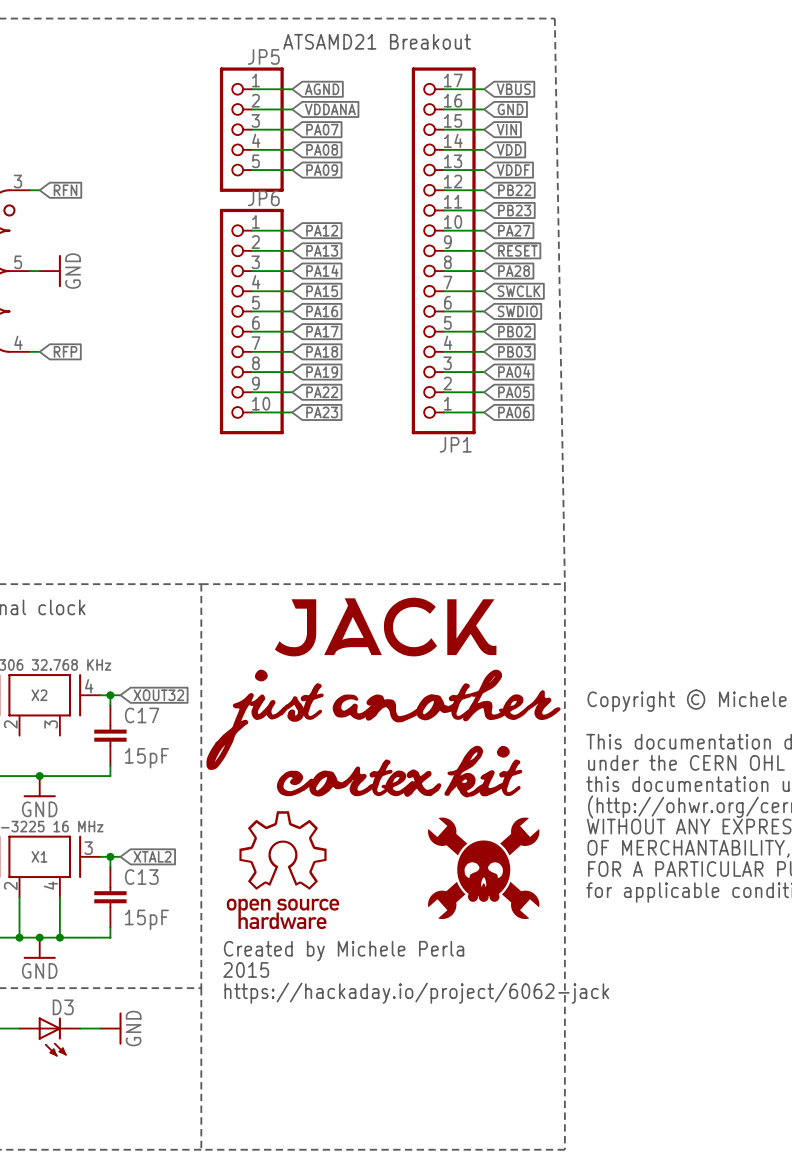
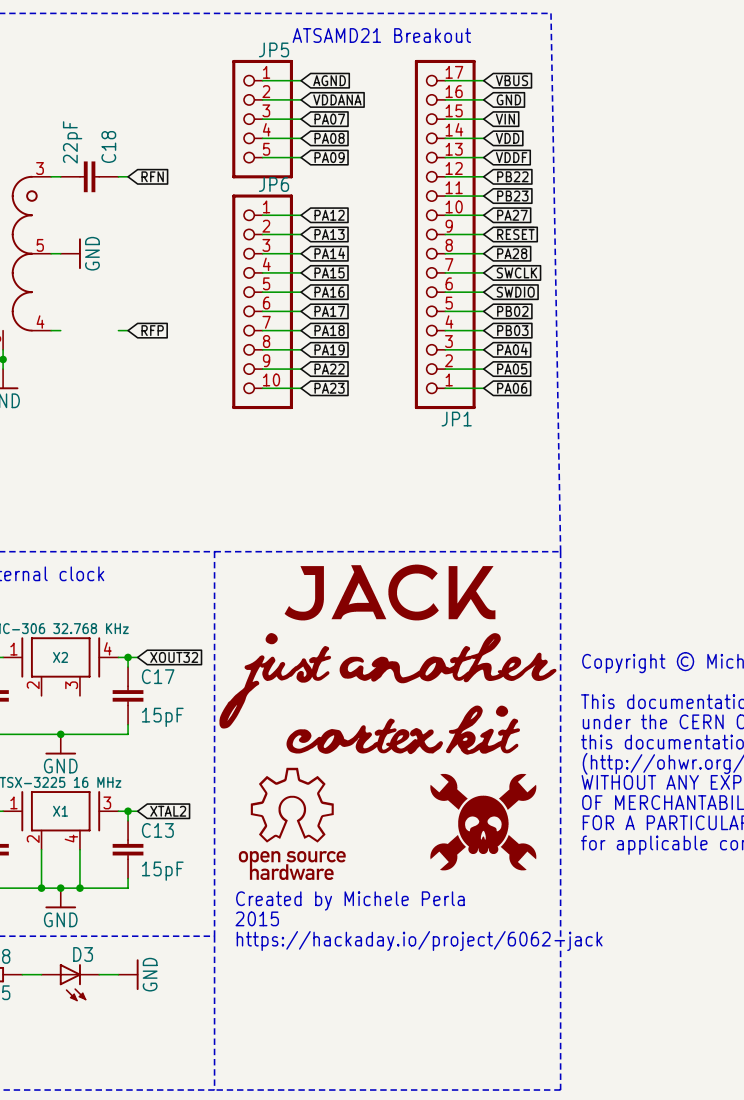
global label position: RFN (65, 190) -> RFN (152, 176)
C18: none -> 22pF (89, 176)
wire: none -> (118, 176) (128, 176)
global label position: RFP (65, 351) -> RFP (152, 330)
wire: none -> (118, 330) (128, 330)

